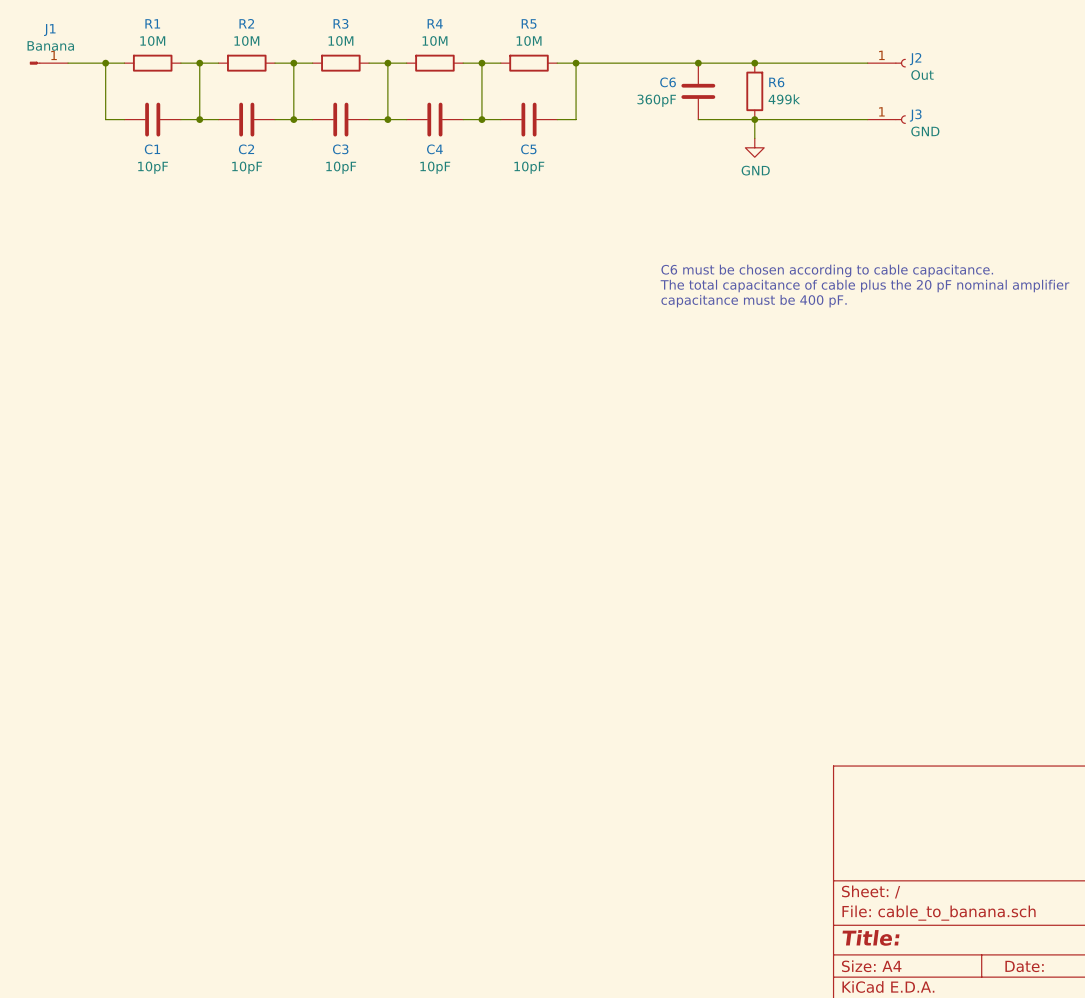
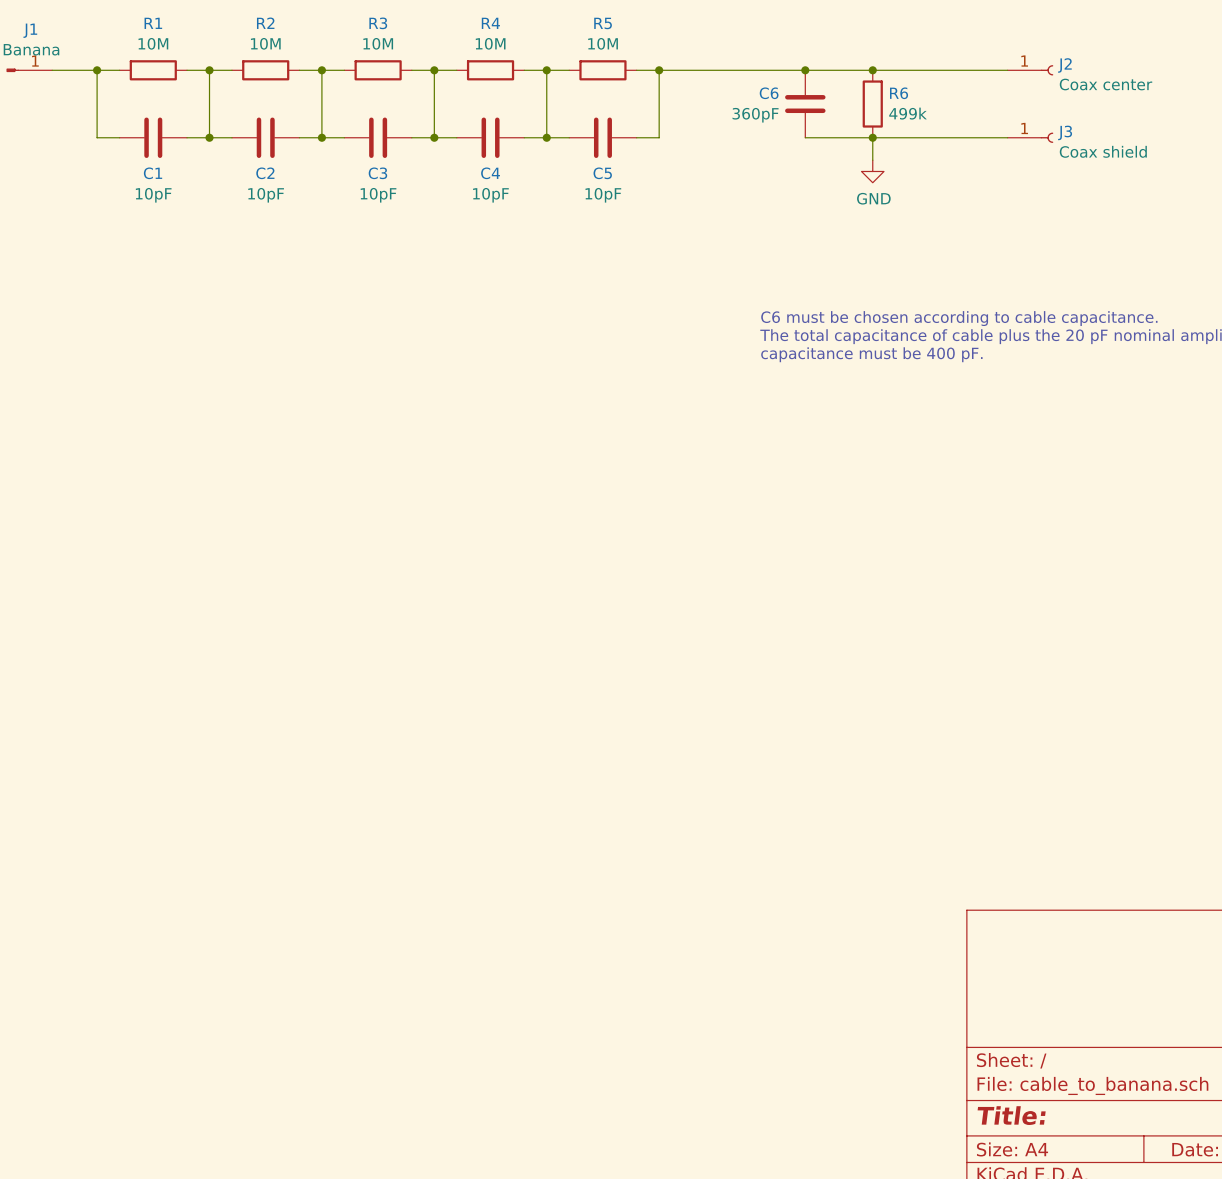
J2 value: Out (922, 75) -> Coax center (1105, 84)
J3 value: GND (925, 131) -> Coax shield (1103, 151)

